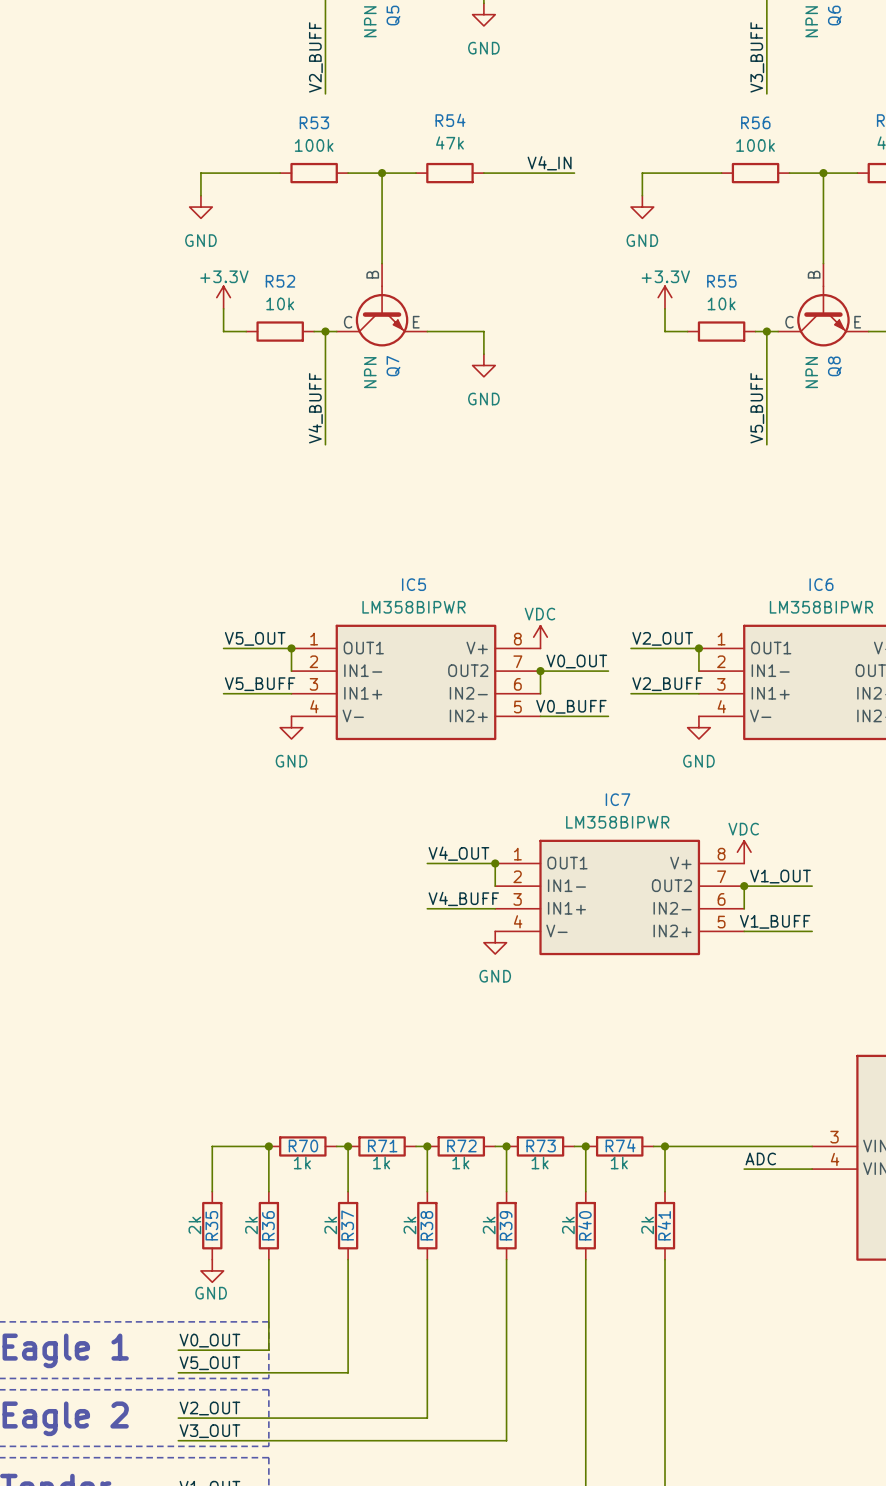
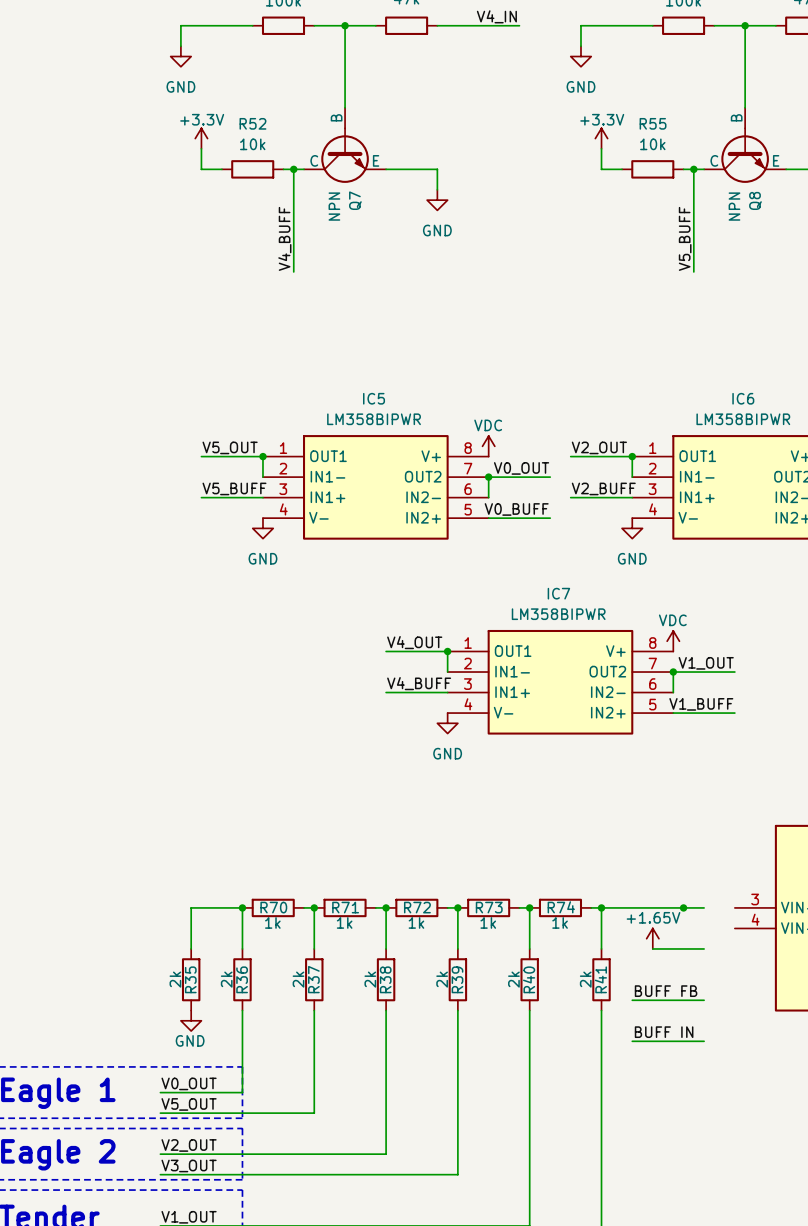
junction: none -> (683, 907)
wire: (778, 1146) (812, 1146) -> none
label: ADC (760, 1158) -> none
wire: (744, 1169) (812, 1169) -> none
power symbol: none -> +1.65V (652, 938)
wire: none -> (652, 948) (704, 948)
label: none -> BUFF FB (666, 991)
wire: none -> (632, 1000) (704, 1000)
label: none -> BUFF IN (664, 1032)
wire: none -> (632, 1041) (704, 1041)

